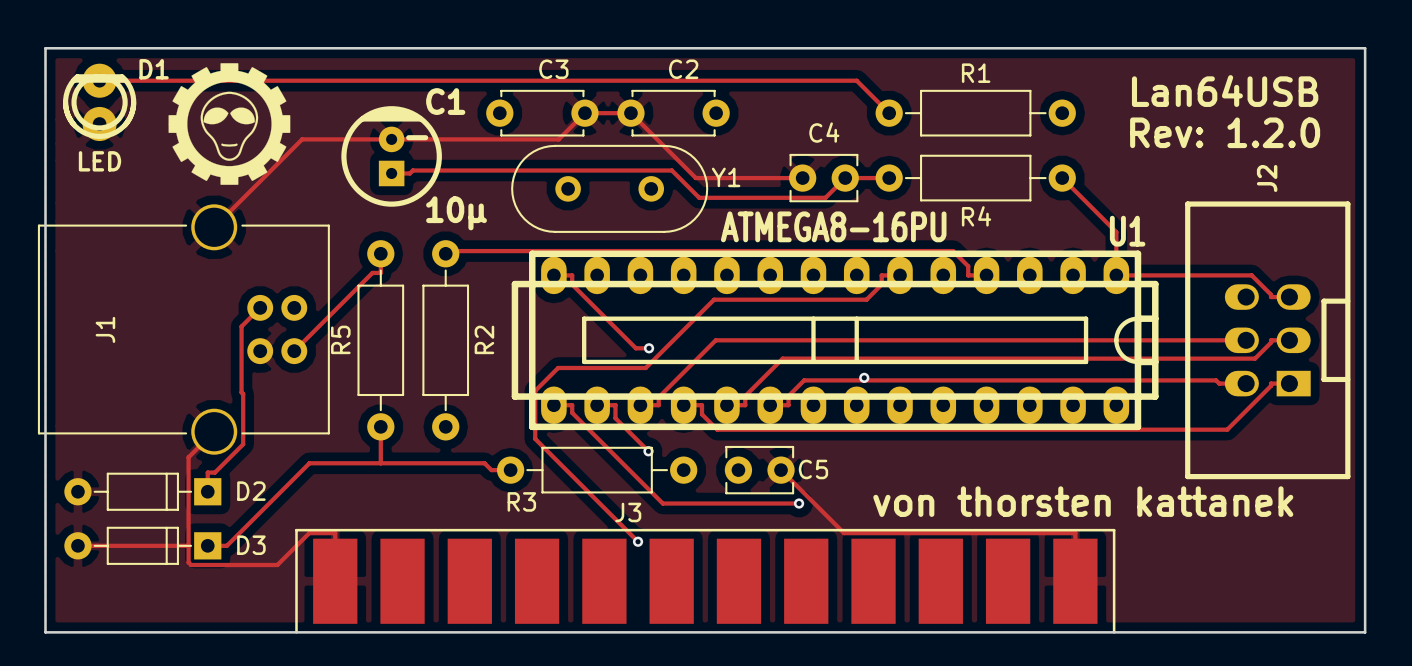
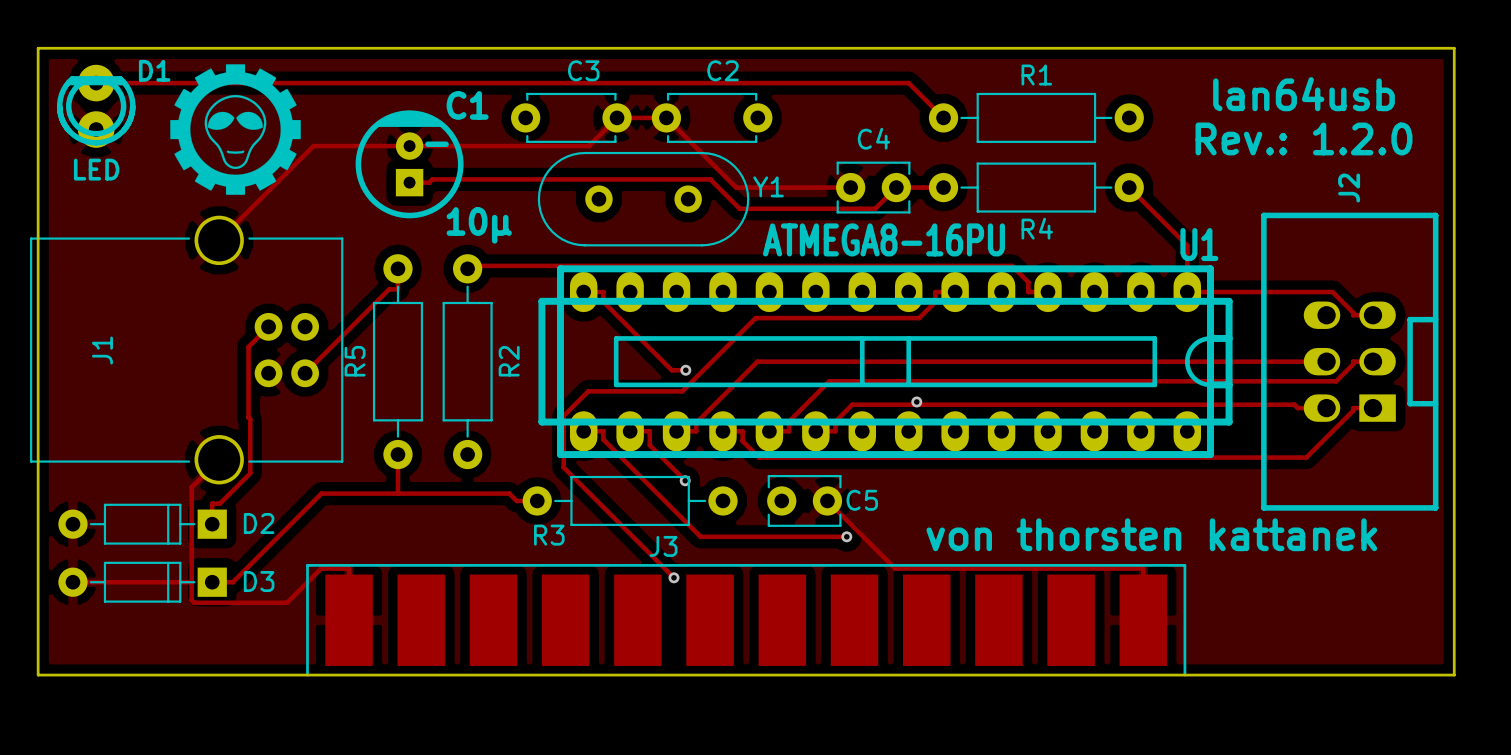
text: Lan64USB (1225, 91) -> lan64usb (1304, 94)
text: Rev: 1.2.0 (1225, 132) -> Rev.: 1.2.0 (1304, 138)

